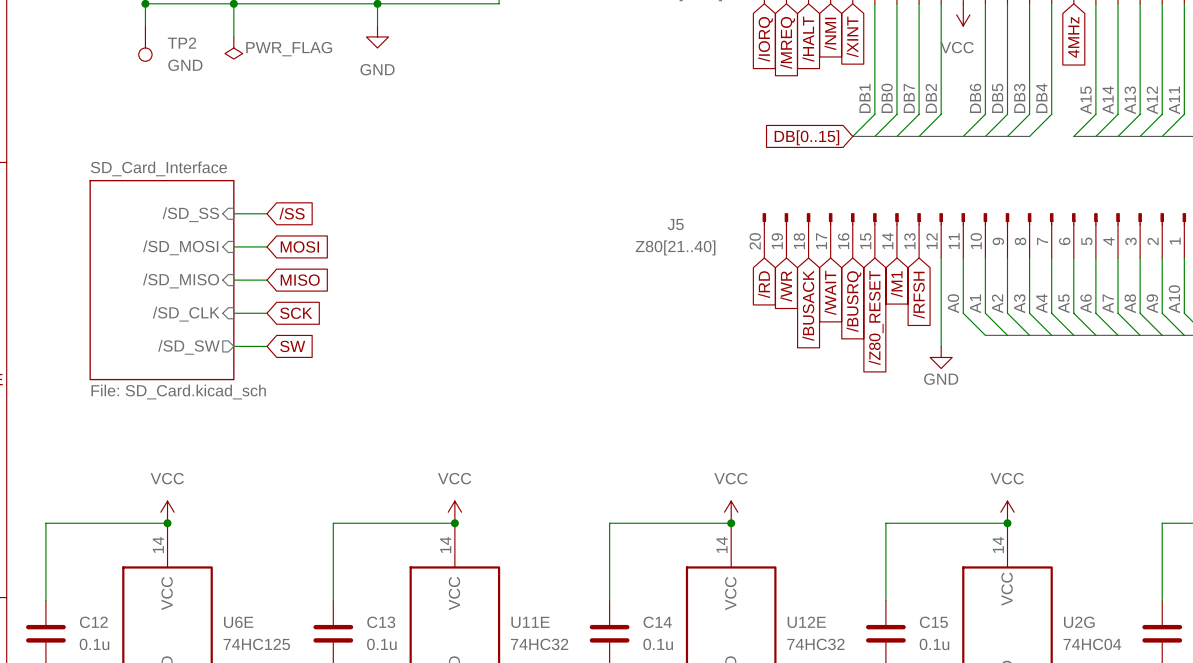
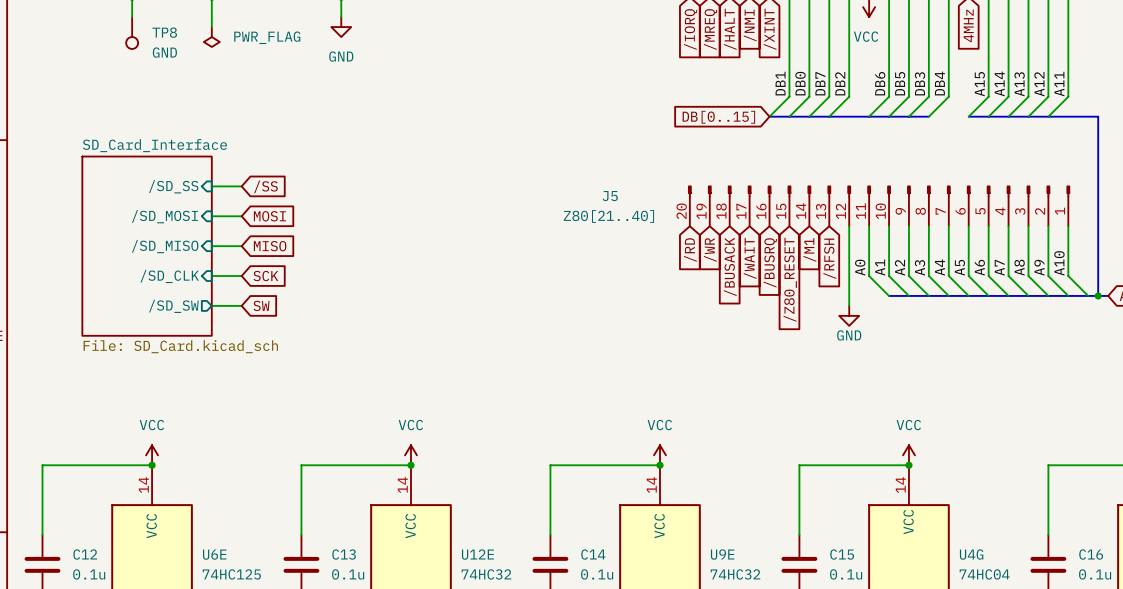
TP2 name: TP2 (182, 43) -> TP8 (164, 32)
U11E name: U11E (530, 622) -> U12E (477, 554)
U12E name: U12E (806, 622) -> U9E (722, 554)
U2G name: U2G (1079, 622) -> U4G (971, 554)

